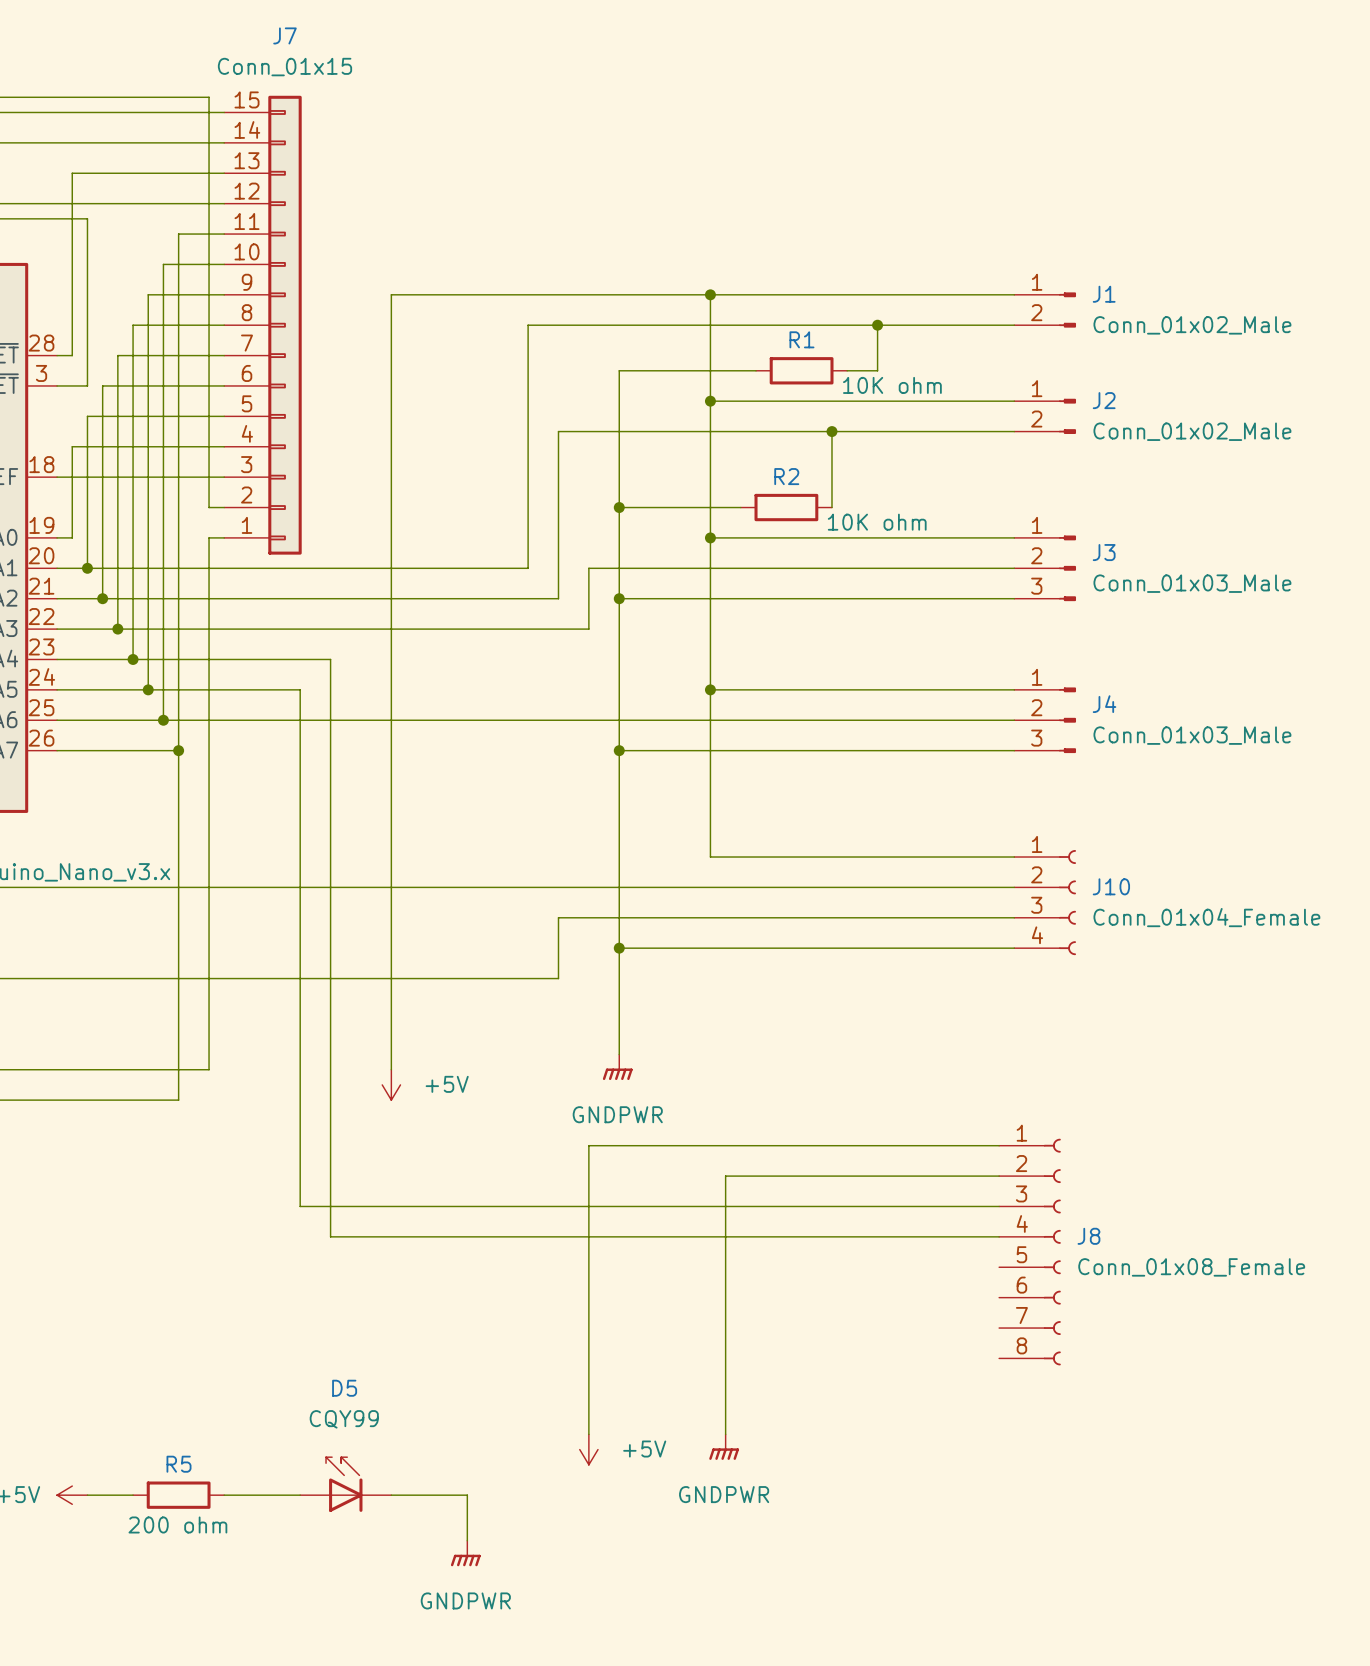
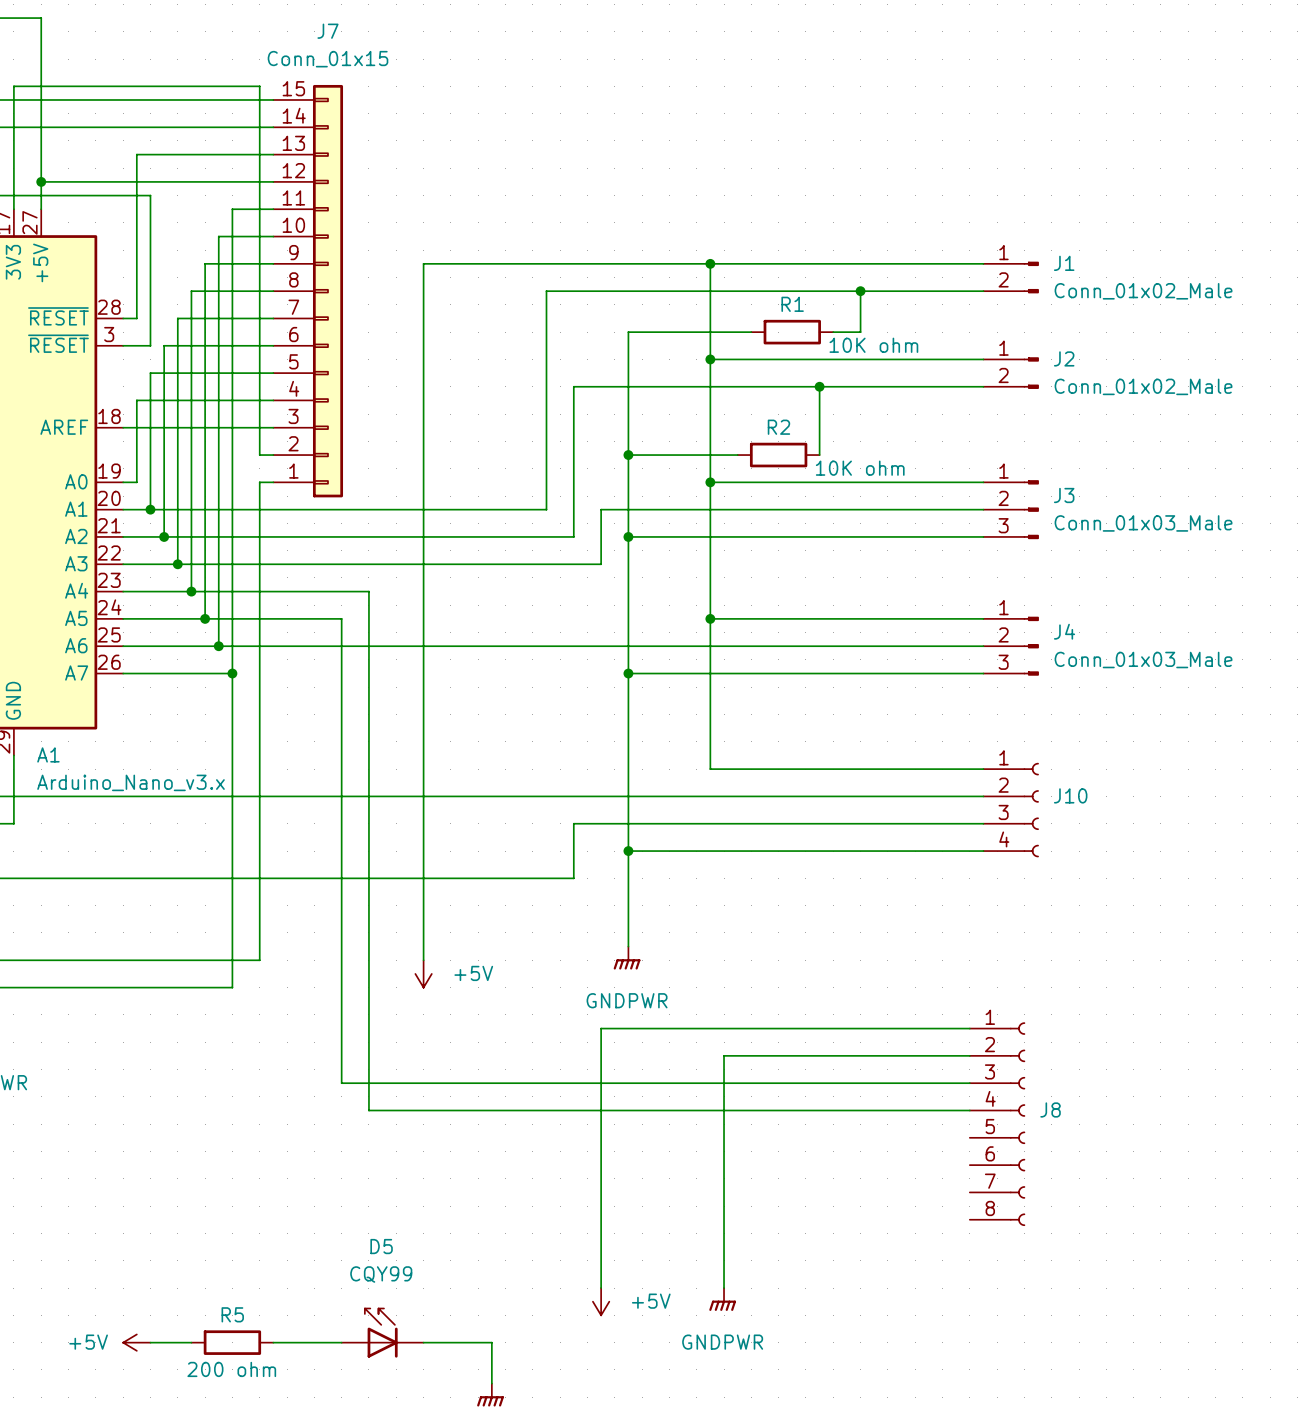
J10 value: Conn_01x04_Female (1206, 917) -> none
J8 value: Conn_01x08_Female (1191, 1267) -> none

